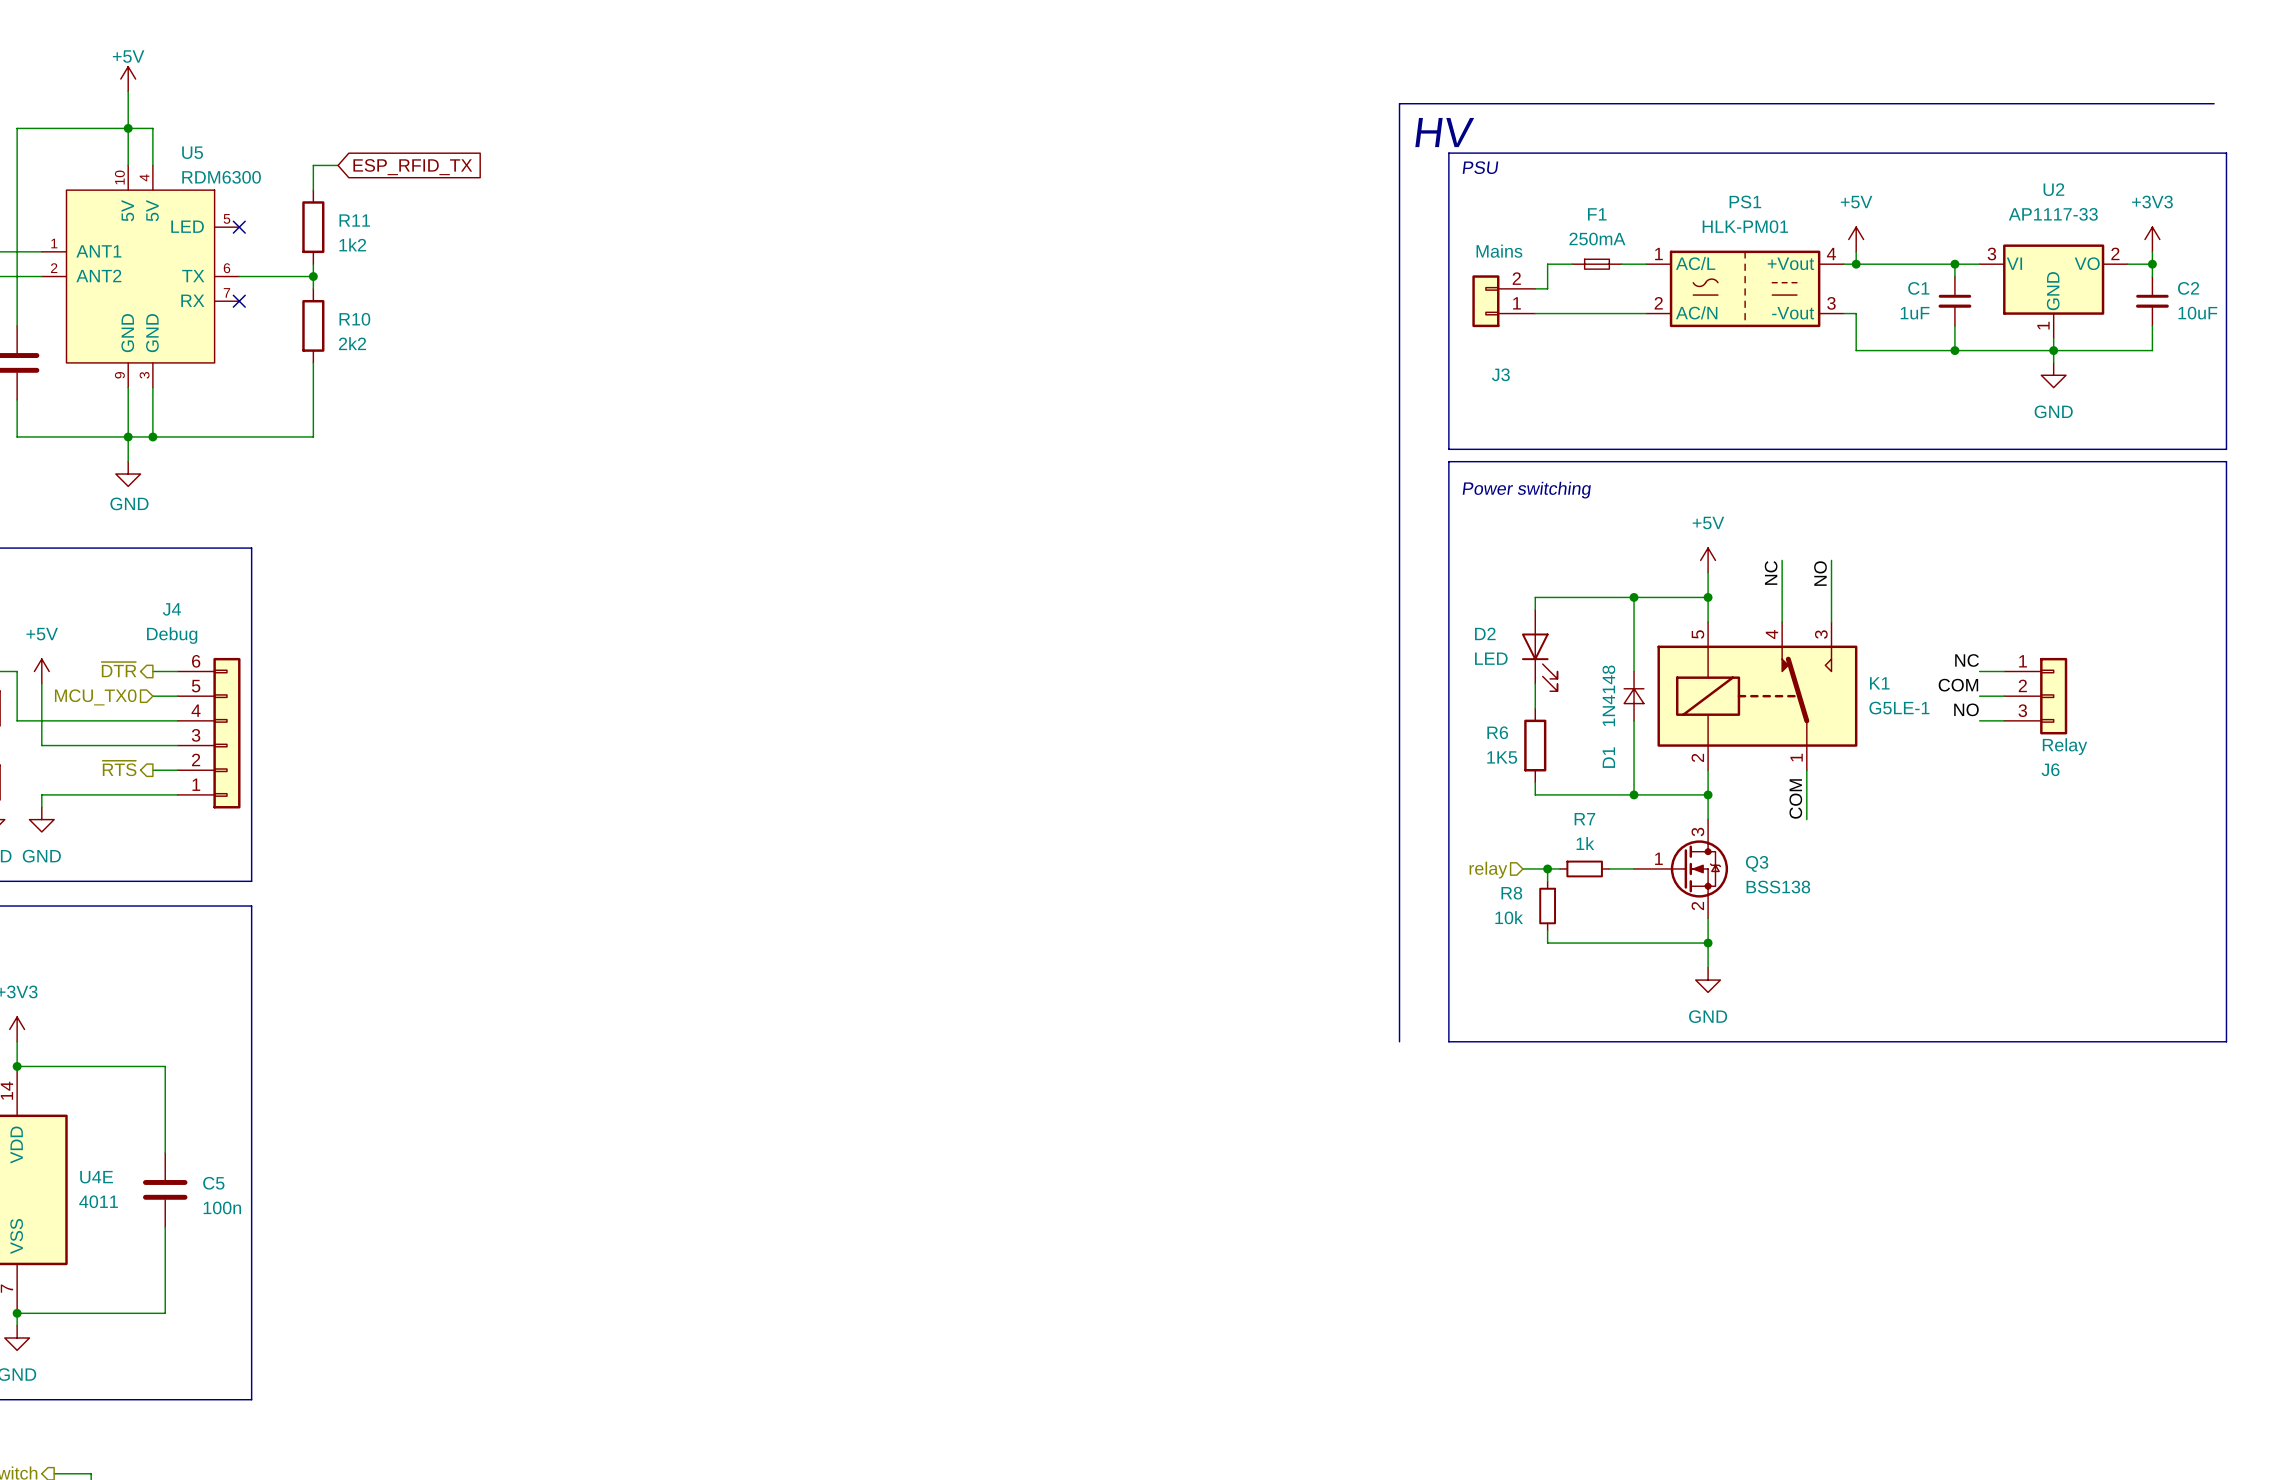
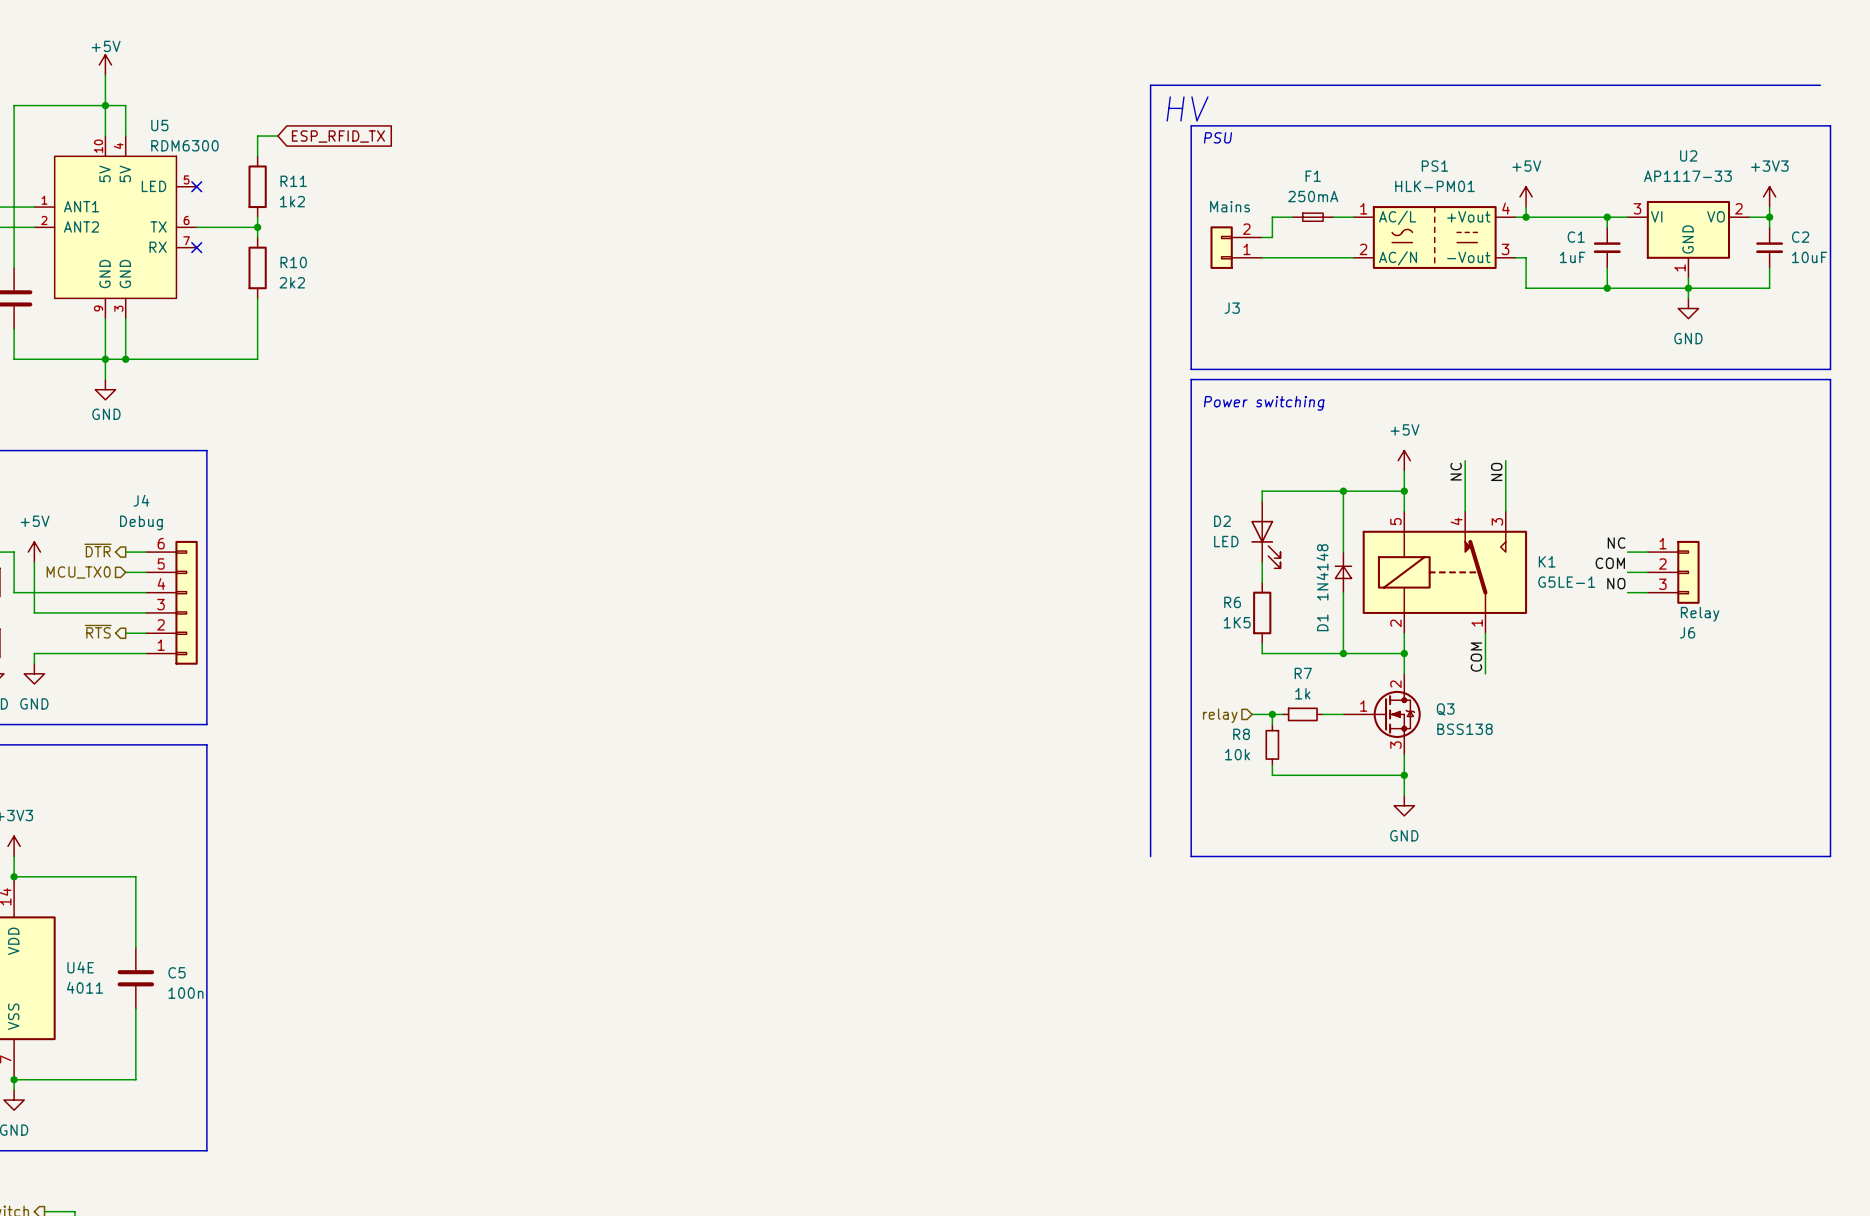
Q3 pin number: 3 (1697, 832) -> 2 (1395, 684)
Q3 pin number: 2 (1697, 906) -> 3 (1395, 745)

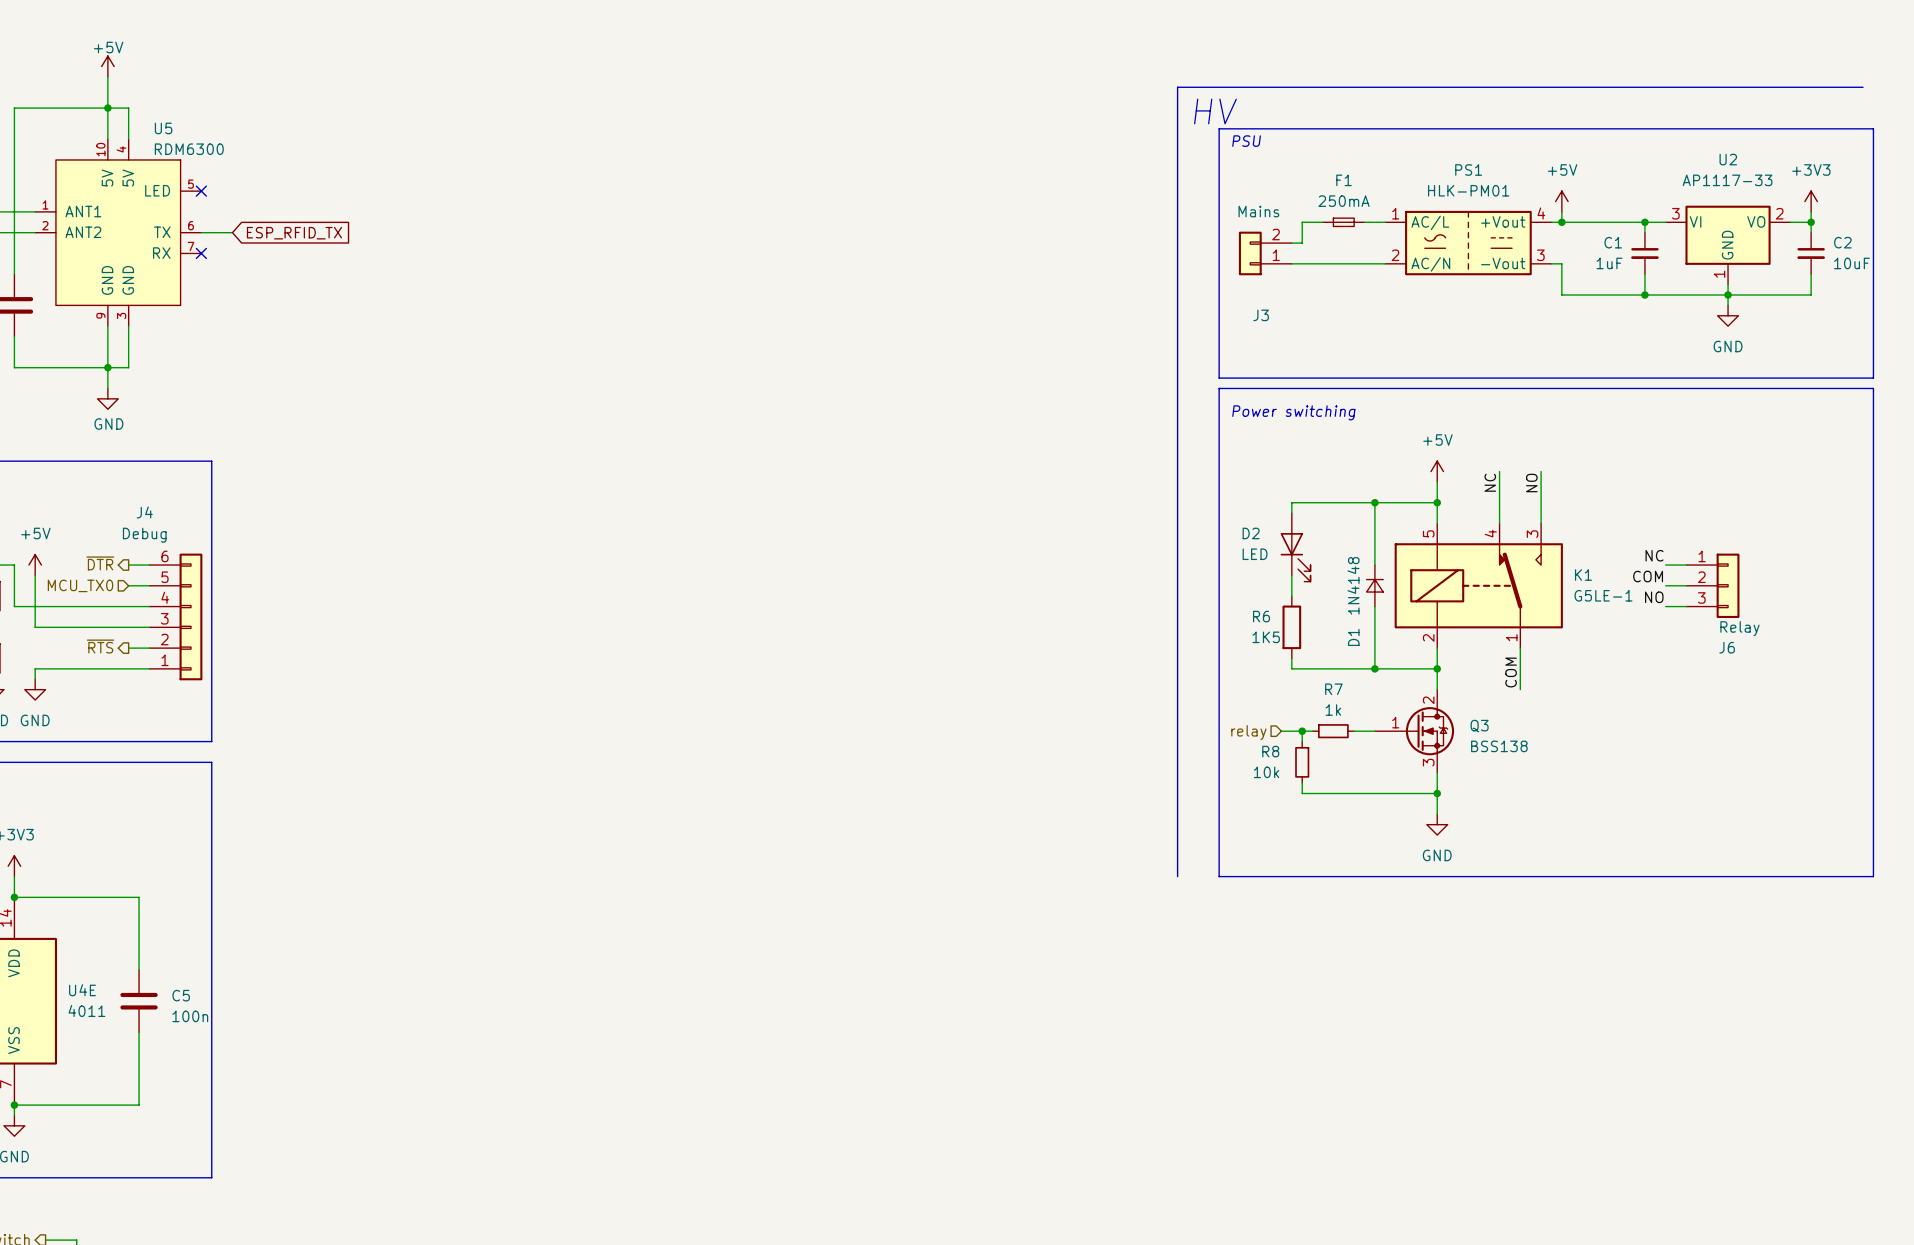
wire: (277, 136) (257, 136) (257, 156) -> none
global label position: ESP_RFID_TX (338, 136) -> ESP_RFID_TX (294, 233)
R11: 1k2 (257, 186) -> none
wire: (257, 217) (257, 237) -> none
wire: (227, 227) (257, 227) -> none
junction: (257, 227) -> none
R10: 2k2 (257, 267) -> none
wire: (257, 298) (257, 359) (125, 359) -> none
junction: (125, 359) -> none

